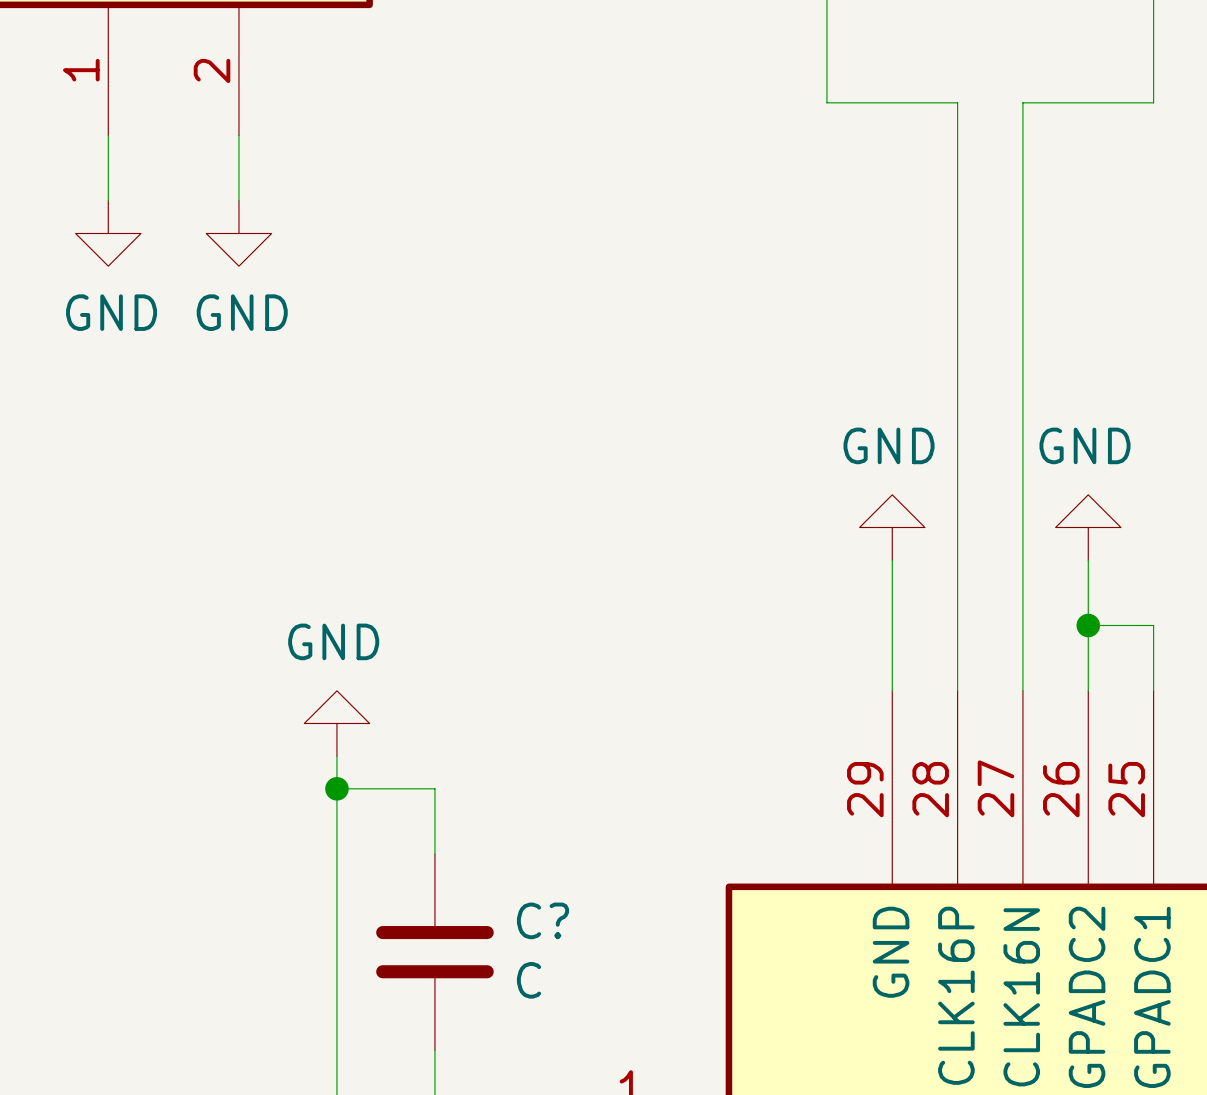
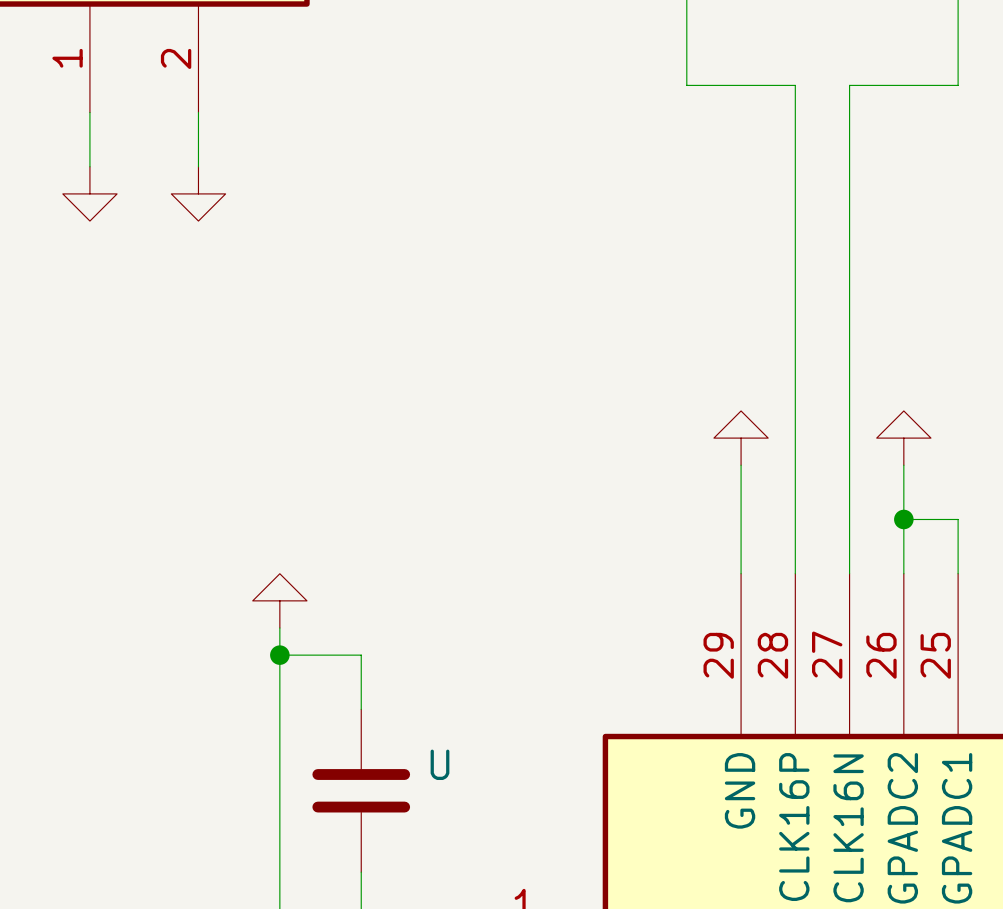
power symbol text: GND (111, 312) -> none
power symbol text: GND (242, 312) -> none
power symbol text: GND (889, 445) -> none
power symbol text: GND (1085, 445) -> none
power symbol text: GND (333, 641) -> none
C? name: C? (543, 920) -> U (439, 764)
C? value: C (529, 980) -> none

